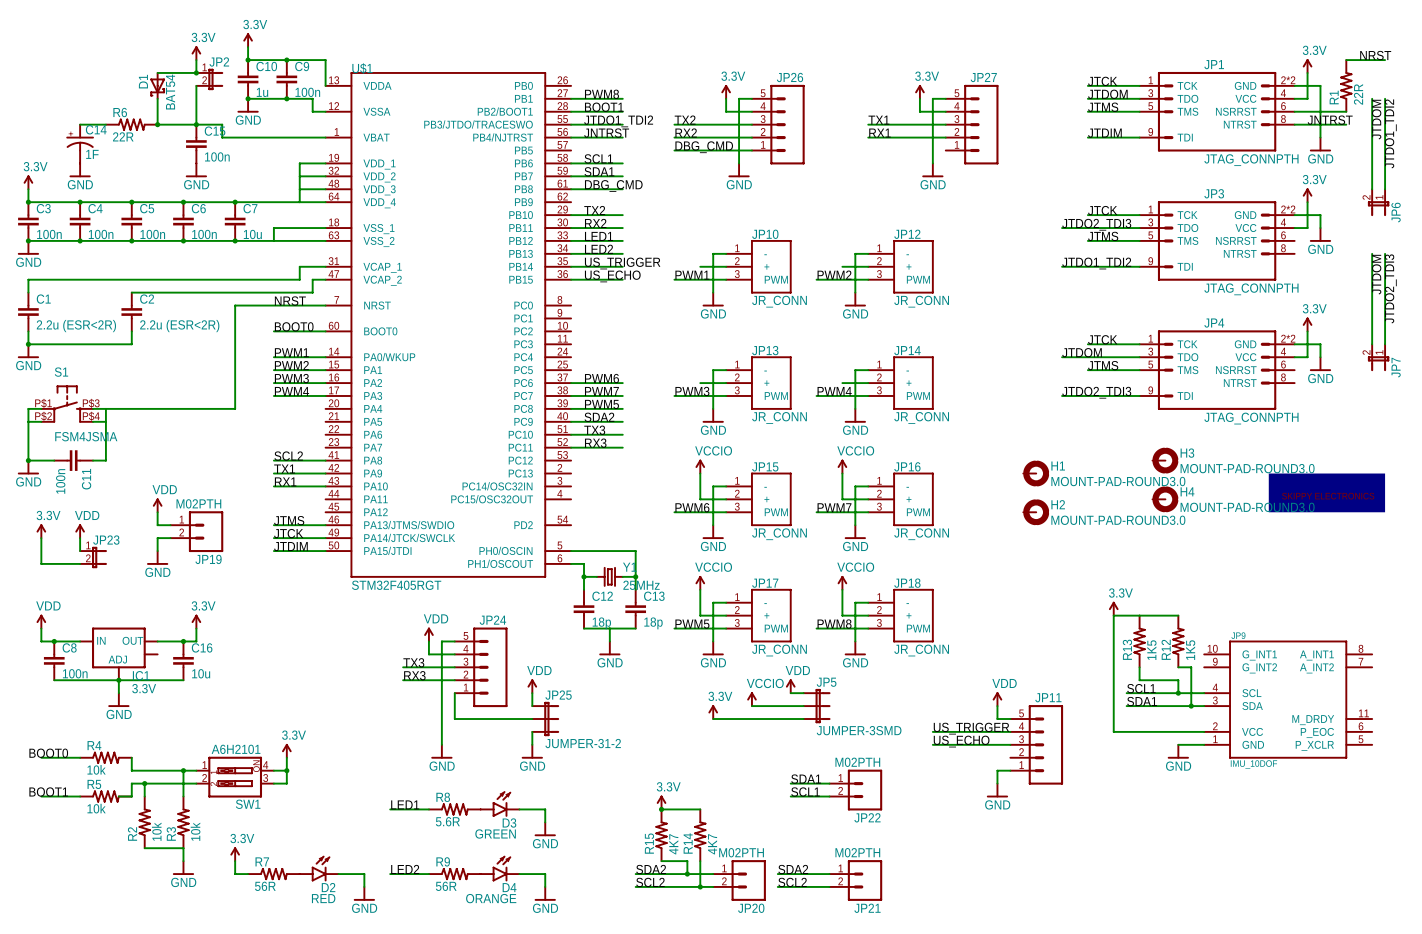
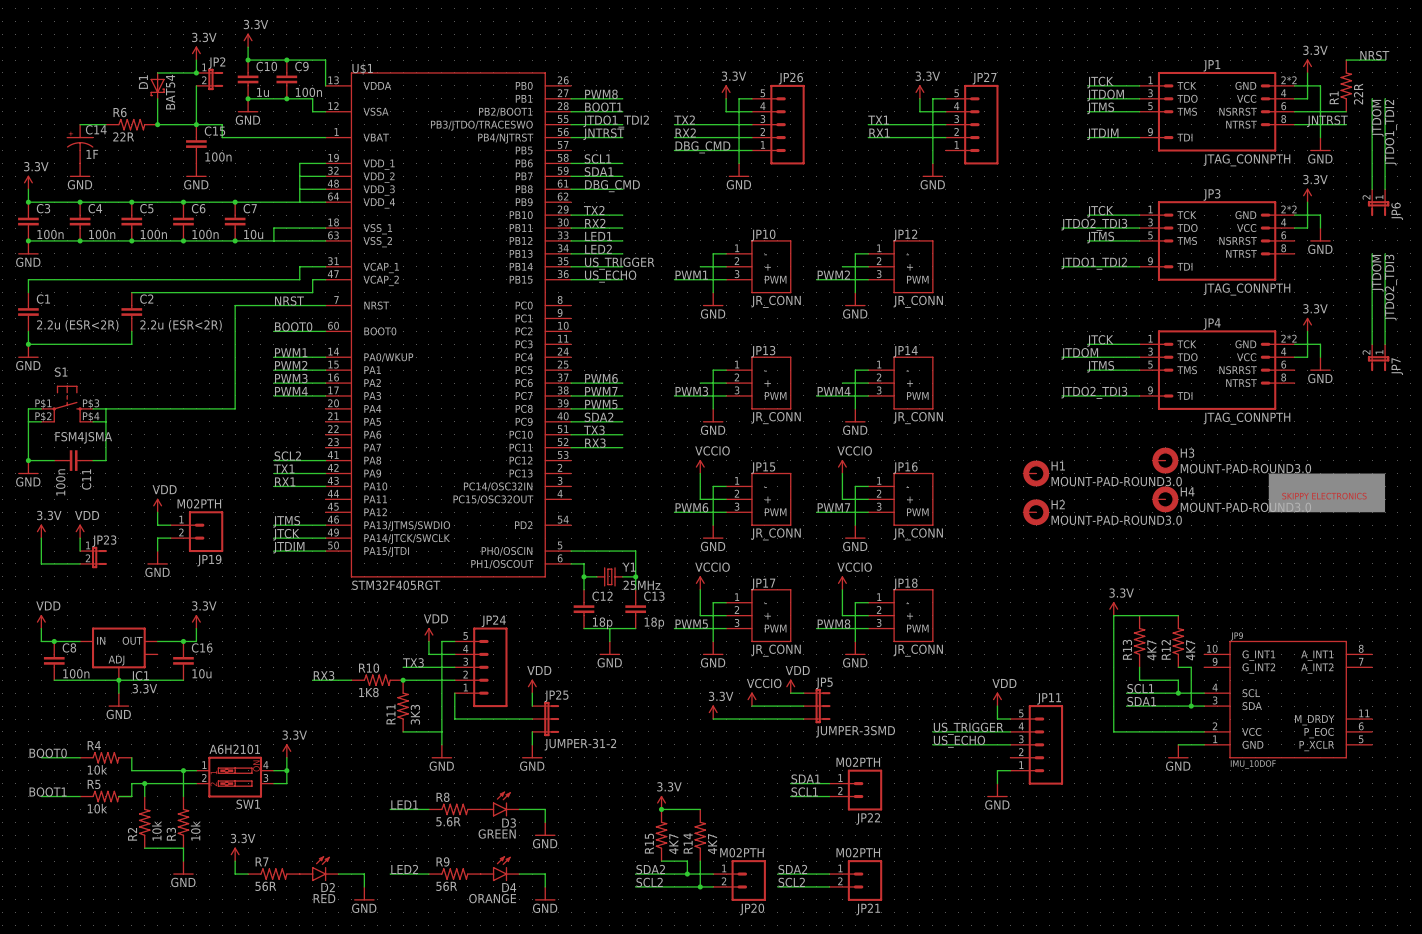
R13 value: 1K5 (1151, 650) -> 4K7 (1151, 650)
R12 value: 1K5 (1190, 650) -> 4K7 (1190, 650)
label position: RX3 (414, 675) -> RX3 (324, 675)
wire: none -> (312, 680) (351, 680)
R10: none -> 1K8 (377, 680)
junction: none -> (403, 680)
R11: none -> 3K3 (403, 706)
wire: none -> (403, 731) (441, 731)

